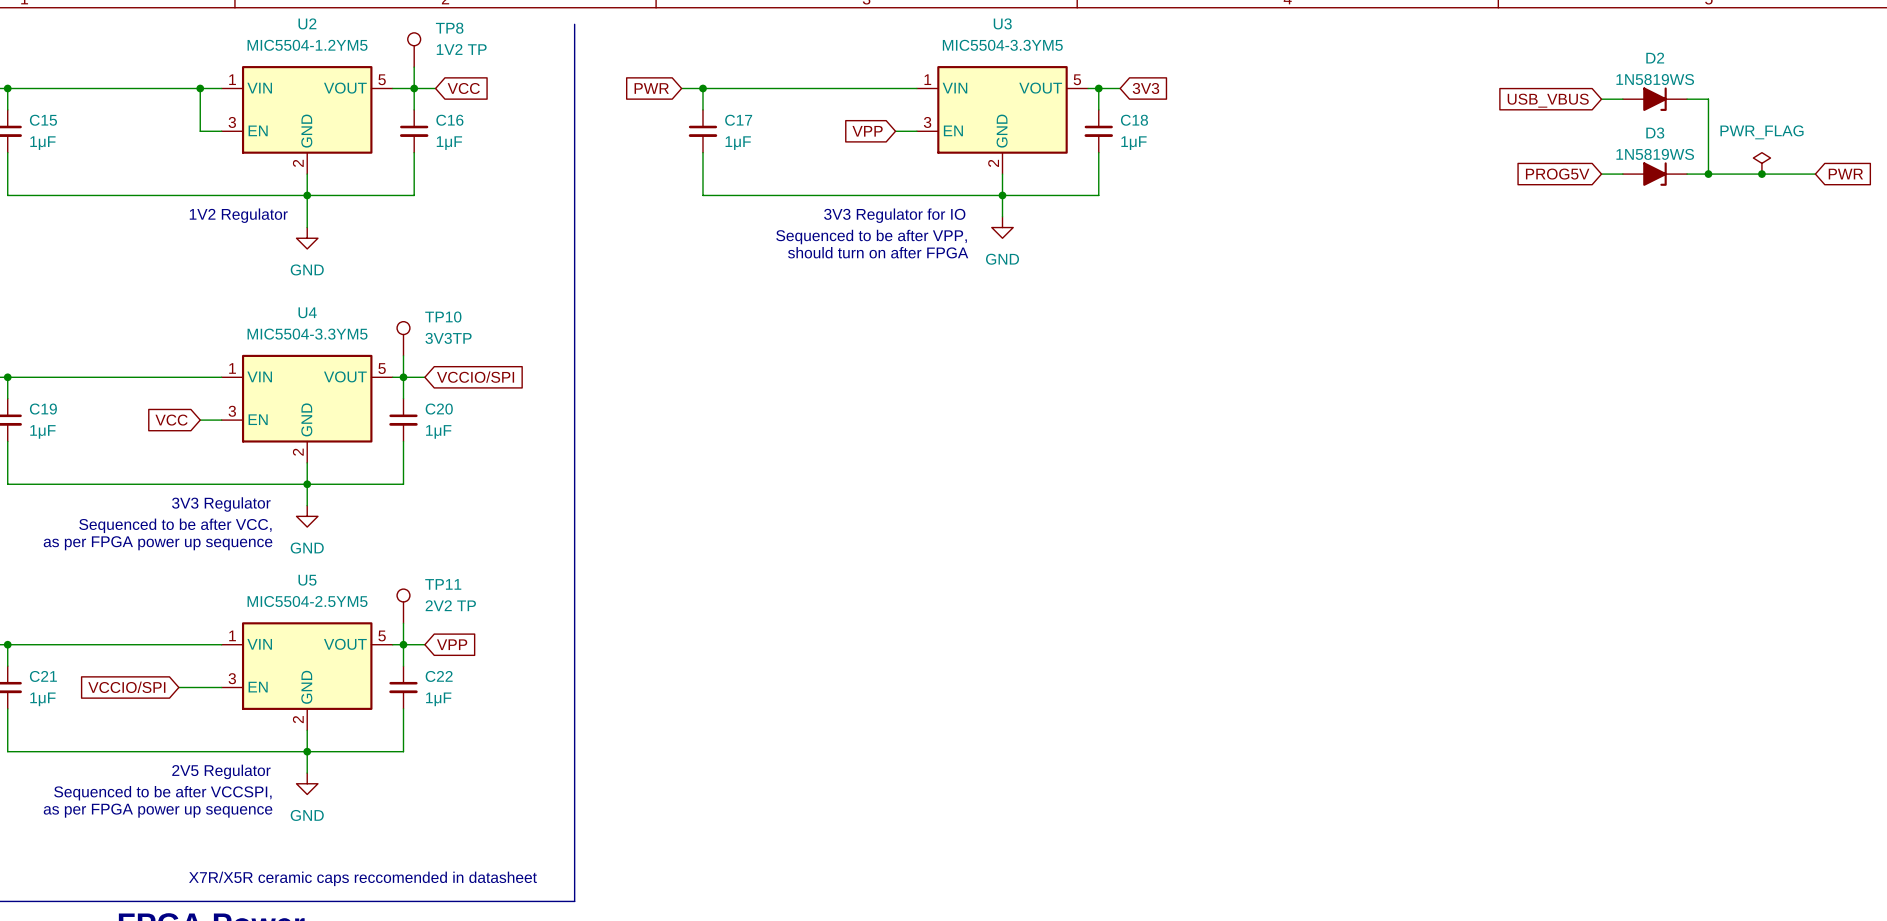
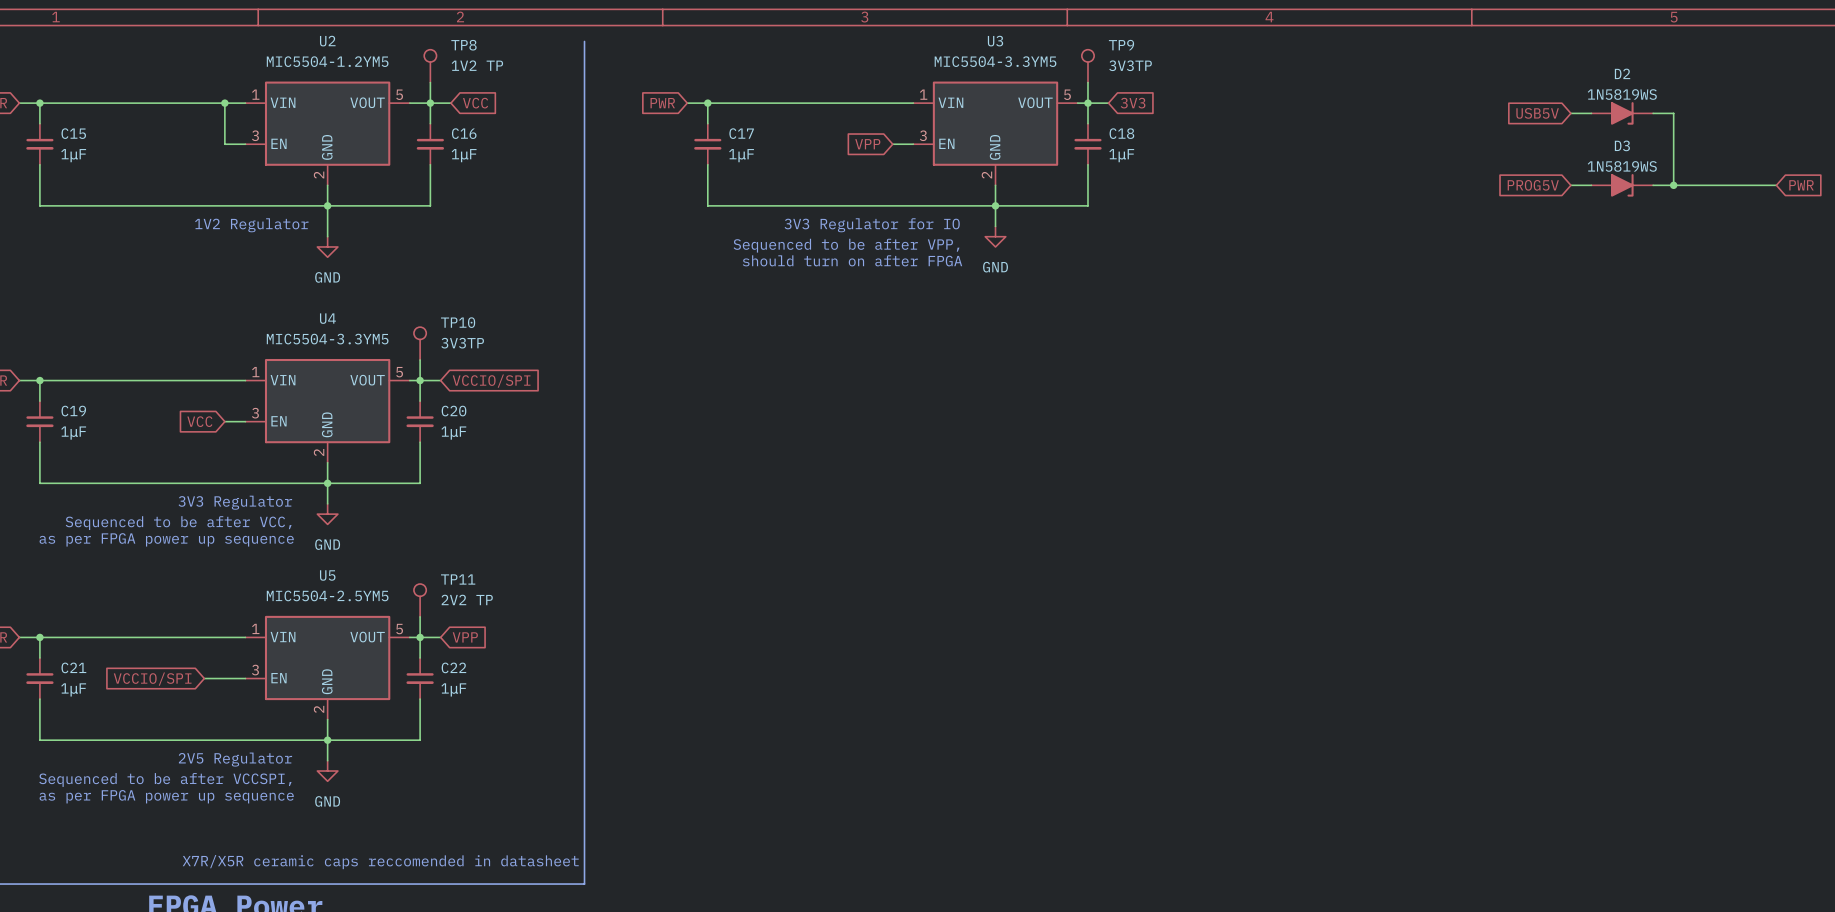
TP9: none -> 3V3TP (1087, 66)
wire: none -> (1087, 82) (1087, 103)
global label: USB_VBUS (1548, 100) -> USB5V (1537, 113)
power symbol: PWR_FLAG (1761, 163) -> none
junction: (1761, 174) -> none

